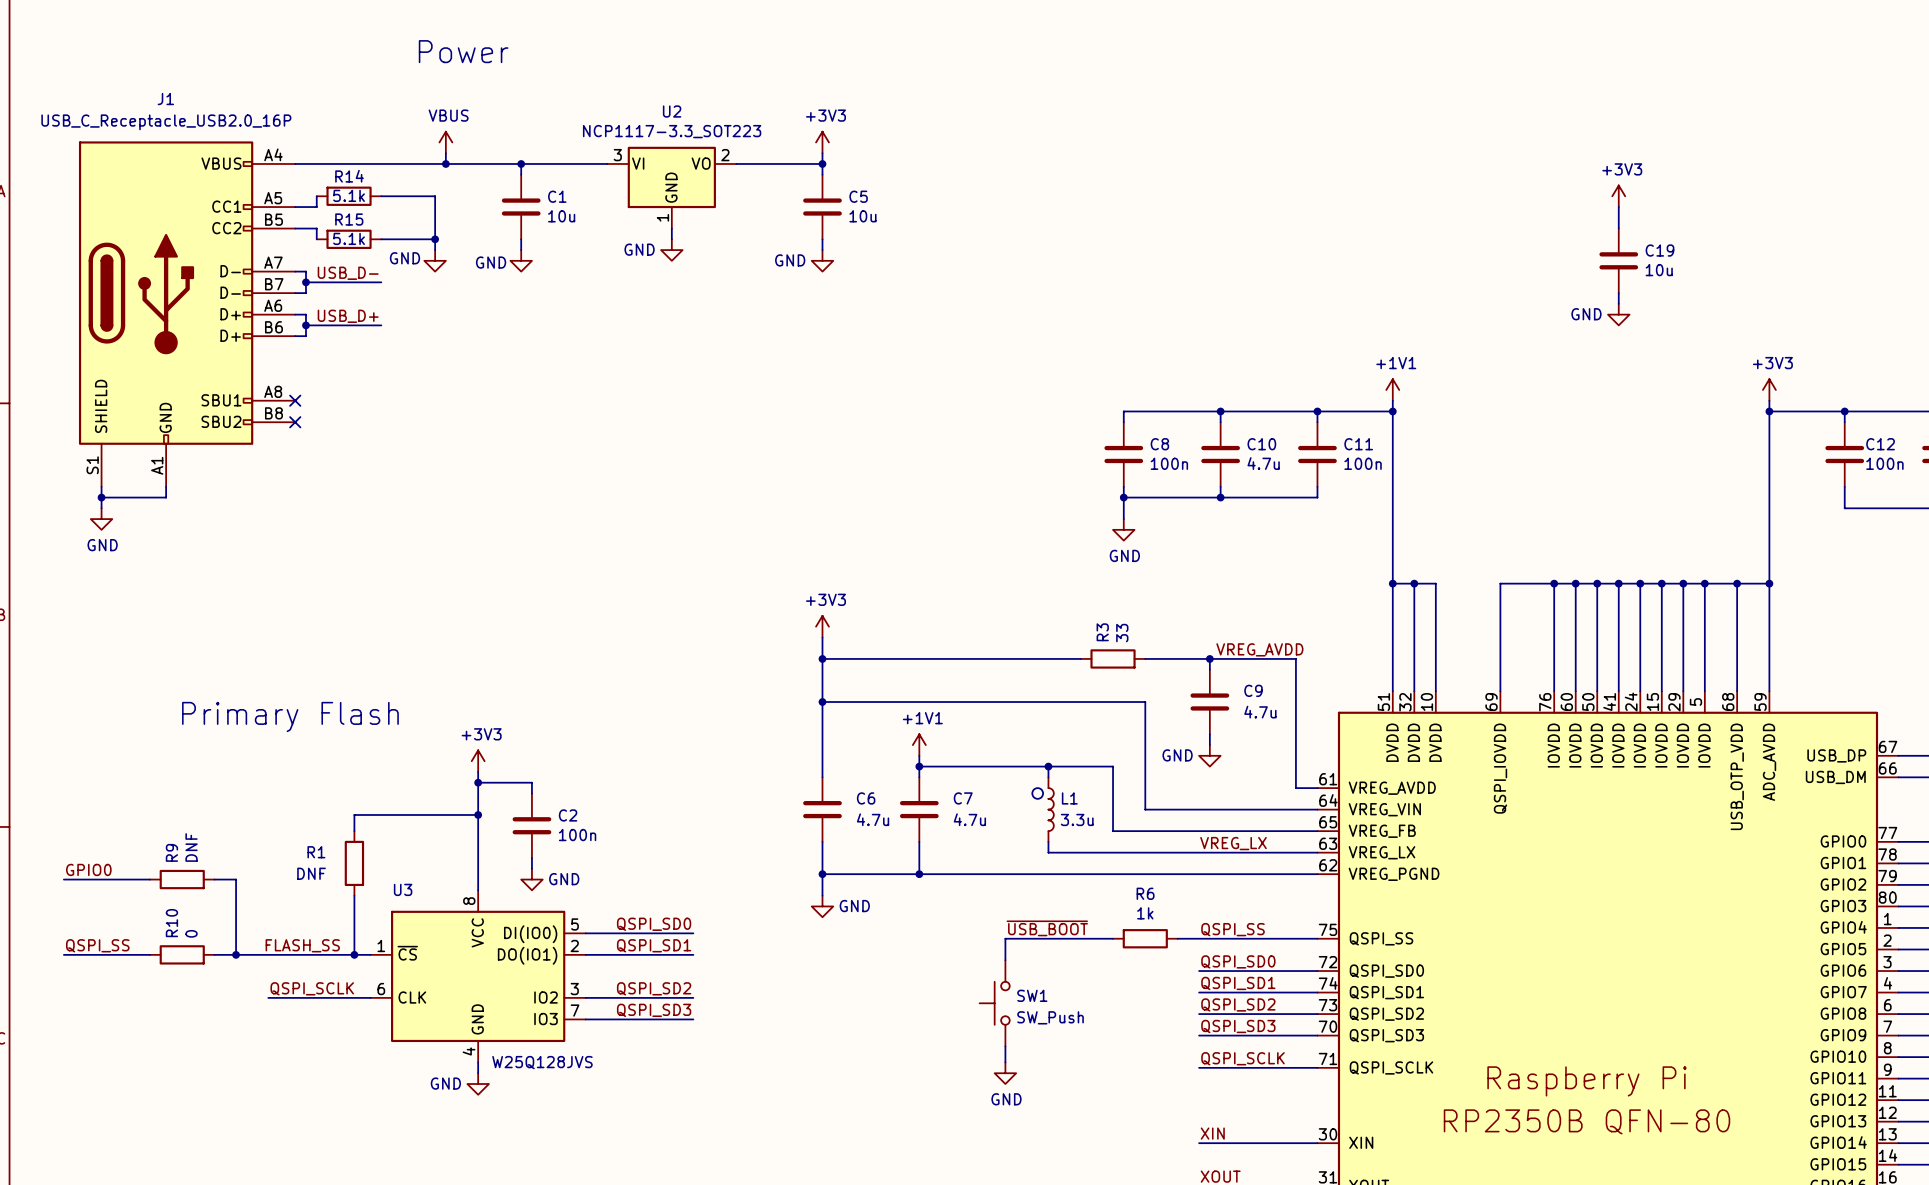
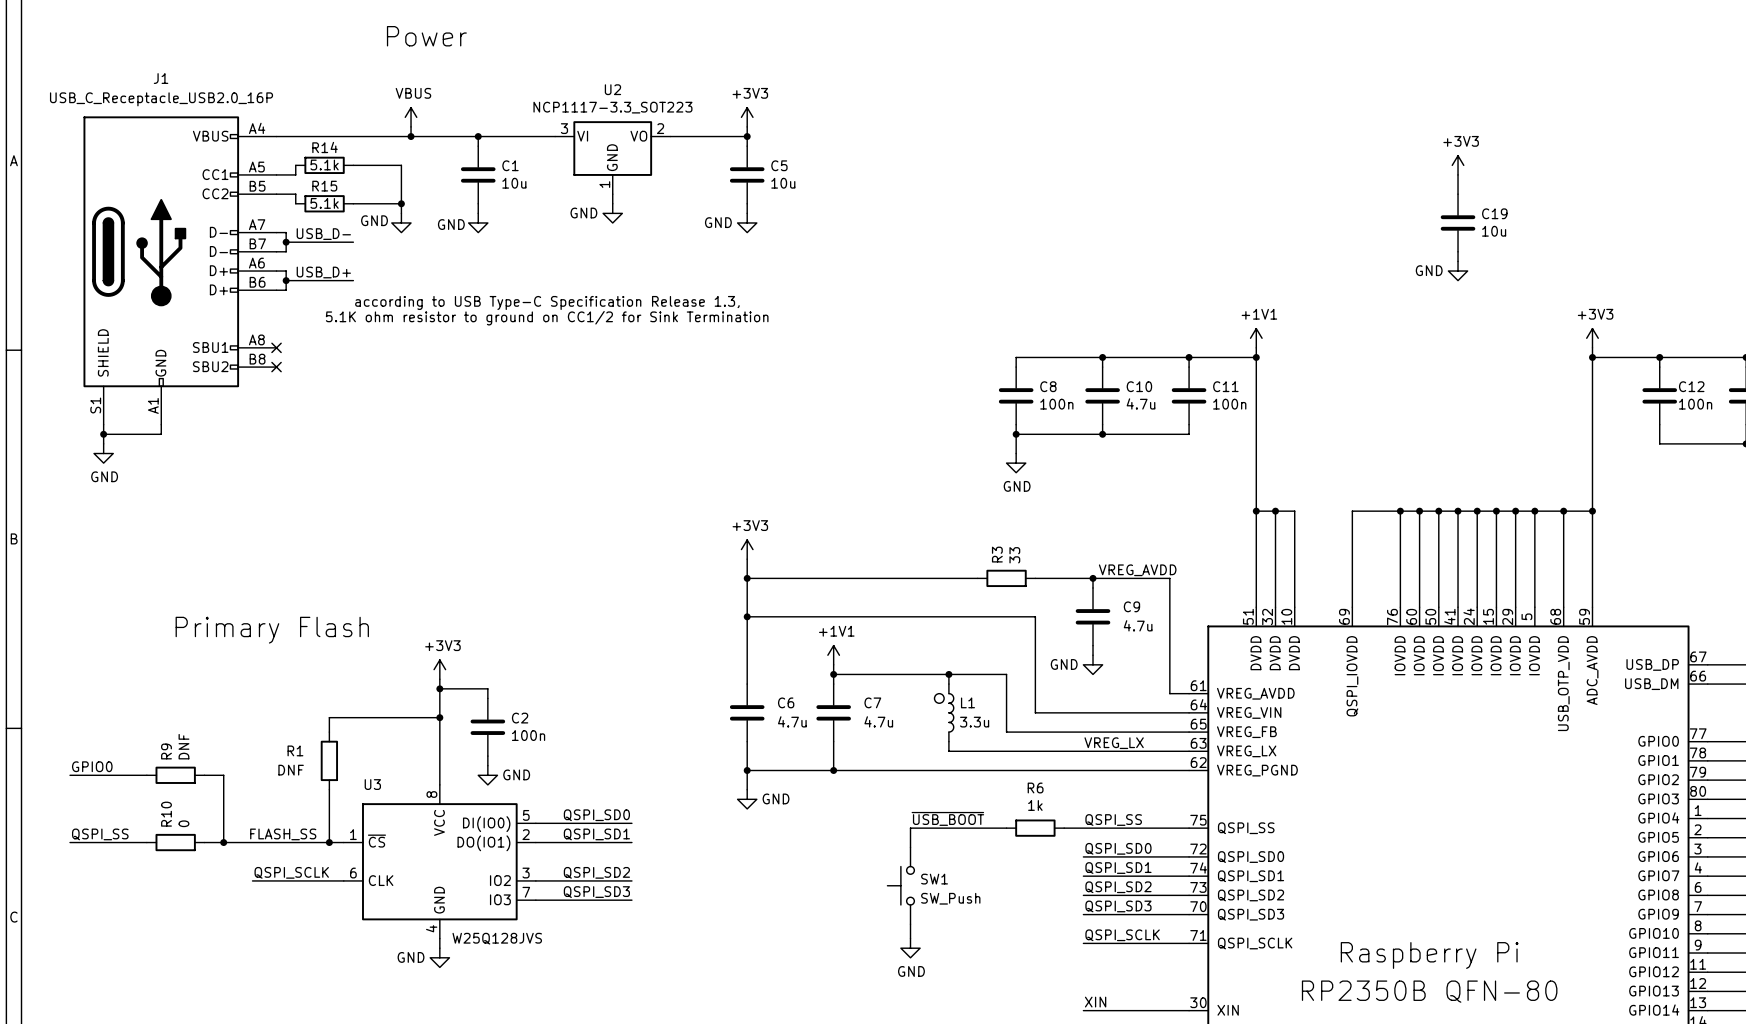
text: none -> according to USB Type-C Specification Release 1.3, (547, 302)
text: none -> 5.1K ohm resistor to ground on CC1/2 for Sink Termination (547, 318)

